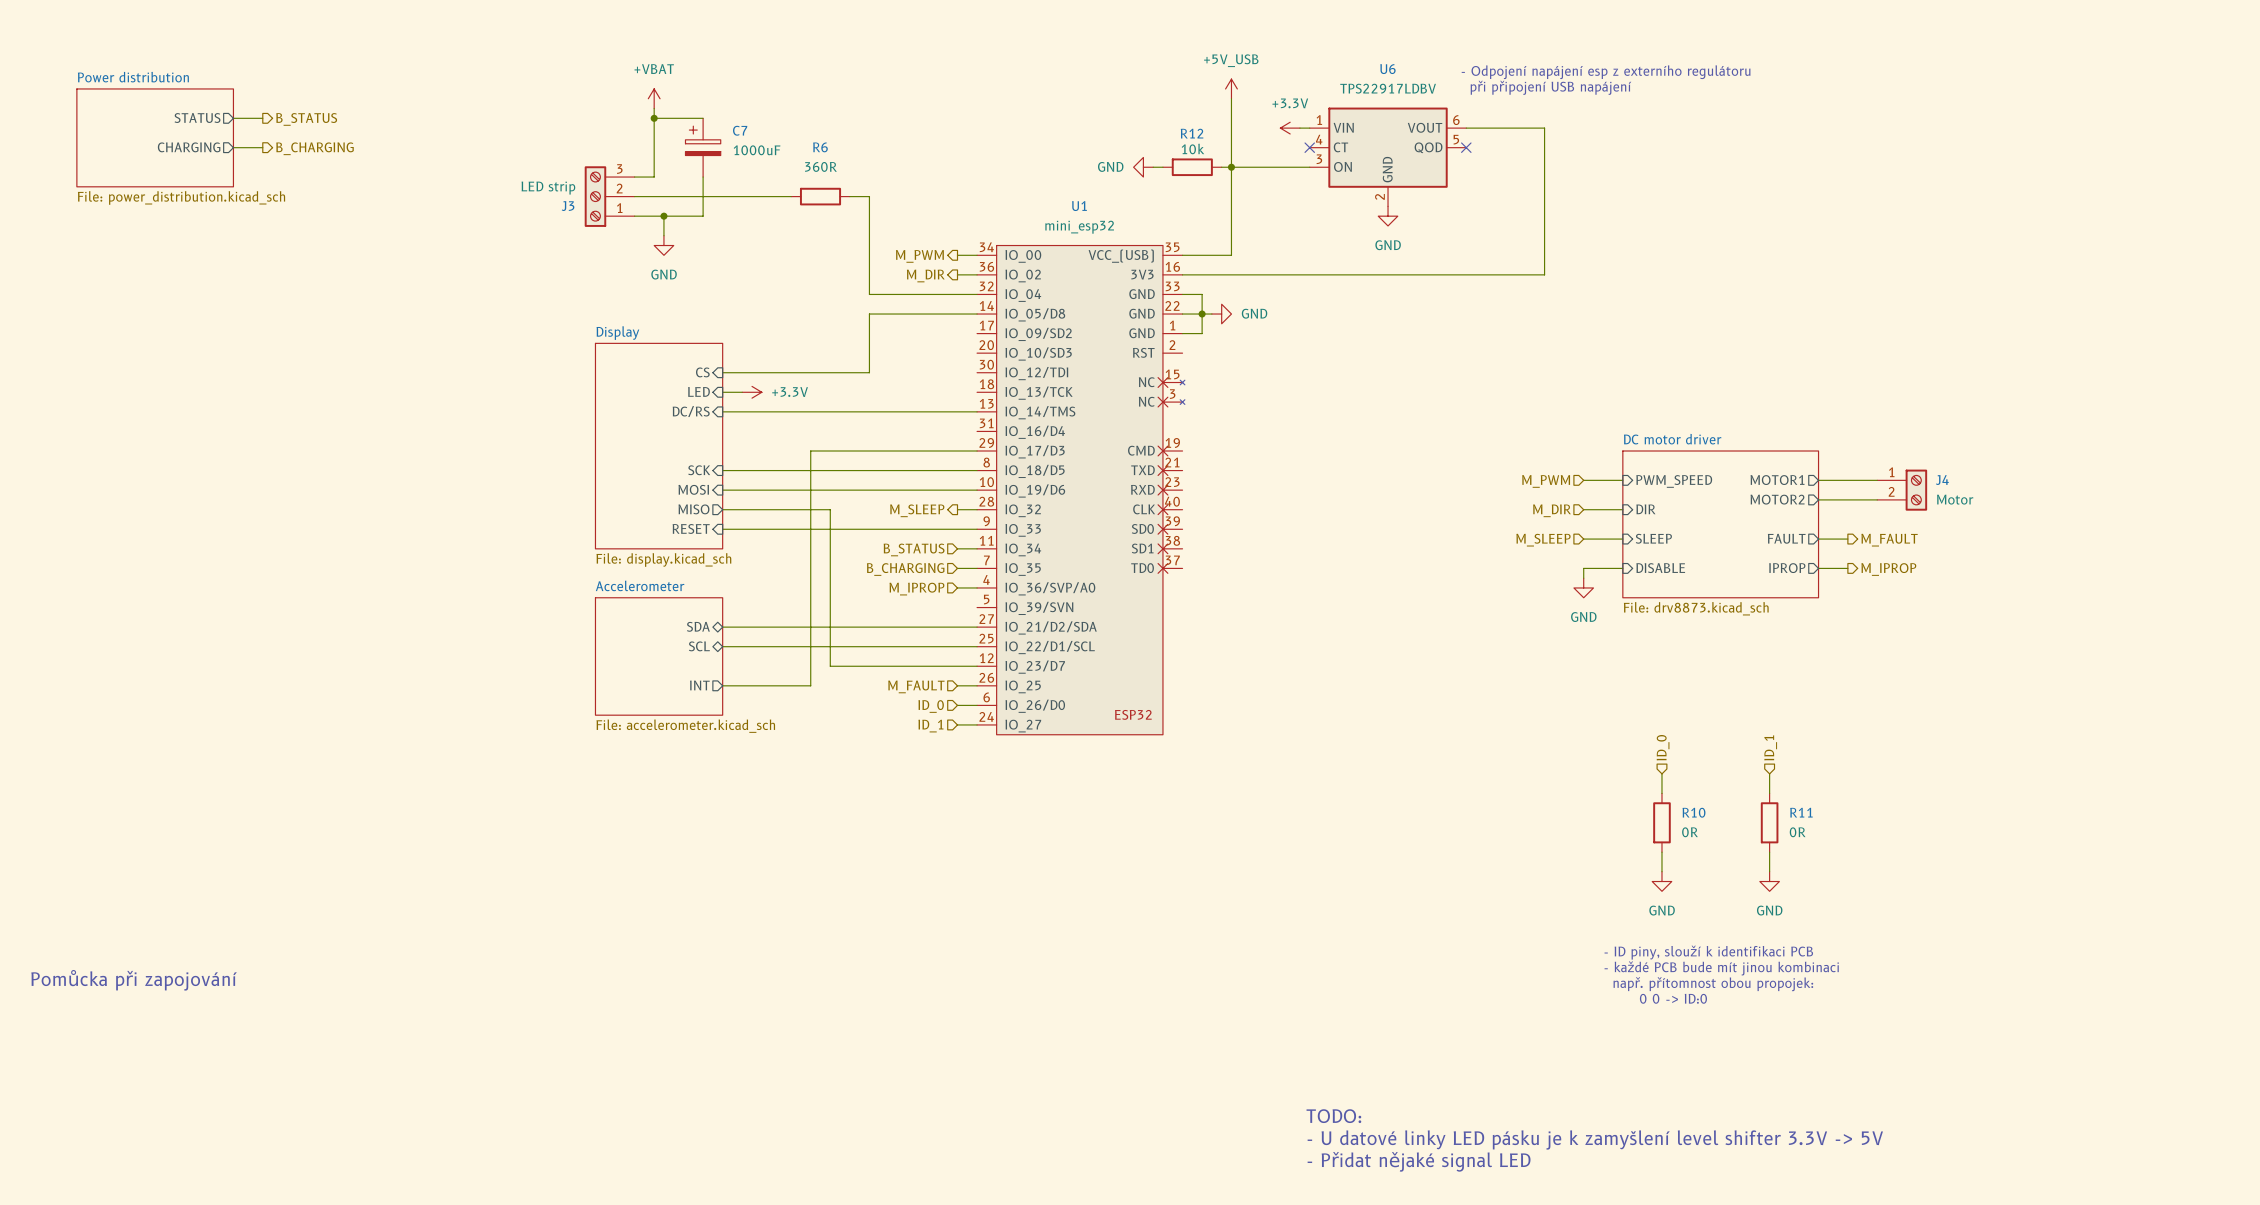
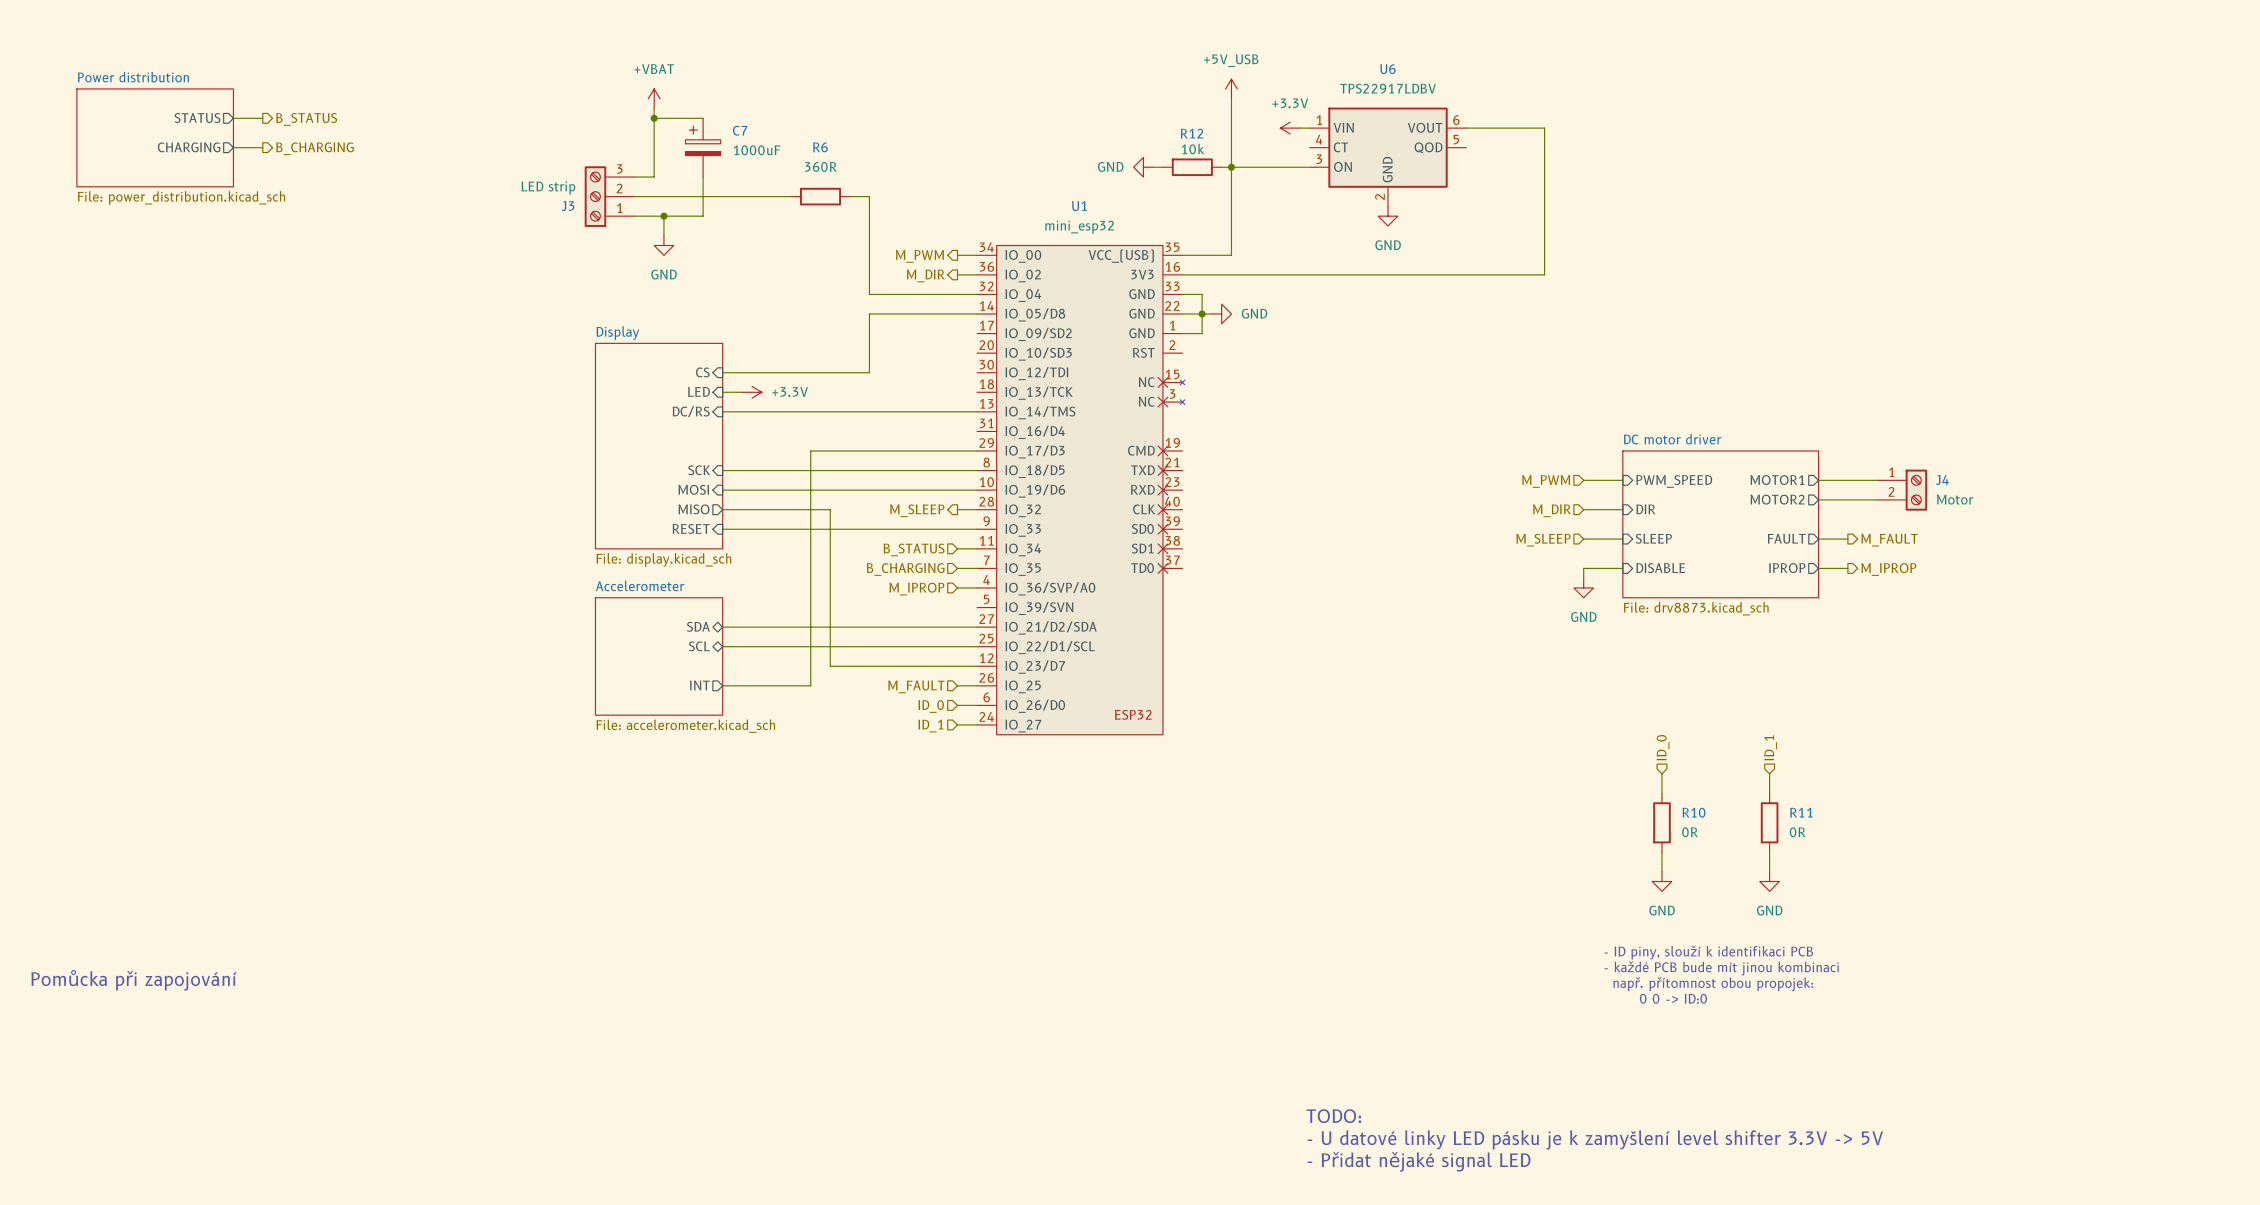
text: - Odpojení napájení esp z externího regulátoru (1606, 72) -> none
text: při připojení USB napájení (1551, 87) -> none
no-connect mark: (1309, 147) -> none
no-connect mark: (1466, 147) -> none

